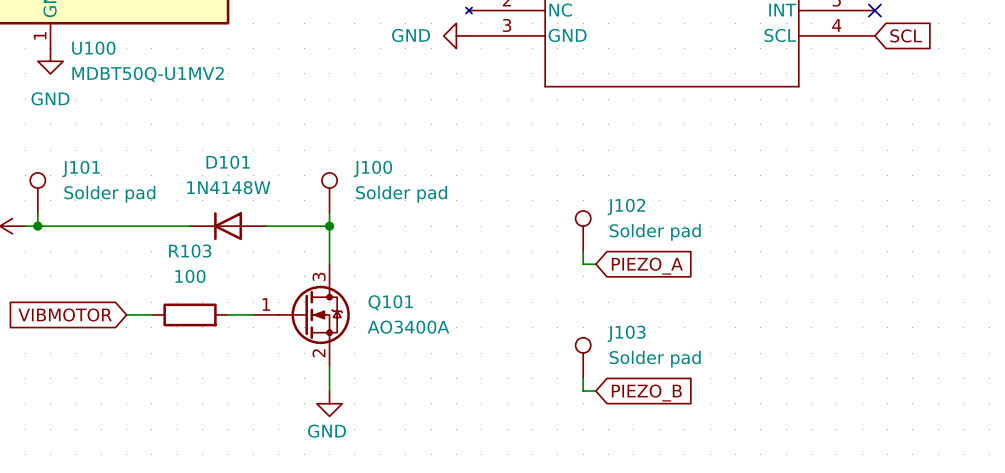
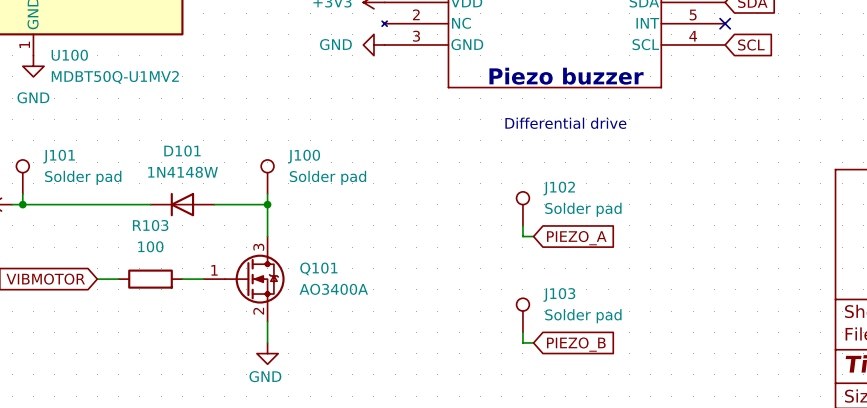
text: none -> Piezo buzzer (566, 76)
text: none -> Differential drive (565, 123)
J102 position: (583, 231) -> (522, 208)
wire: (583, 251) (583, 264) (595, 264) -> (522, 225) (522, 236) (533, 236)
global label position: PIEZO_A (647, 266) -> PIEZO_A (576, 238)
J103 position: (583, 358) -> (522, 315)
wire: (583, 378) (583, 391) (595, 391) -> (522, 332) (522, 342) (533, 342)
global label position: PIEZO_B (646, 392) -> PIEZO_B (576, 344)

